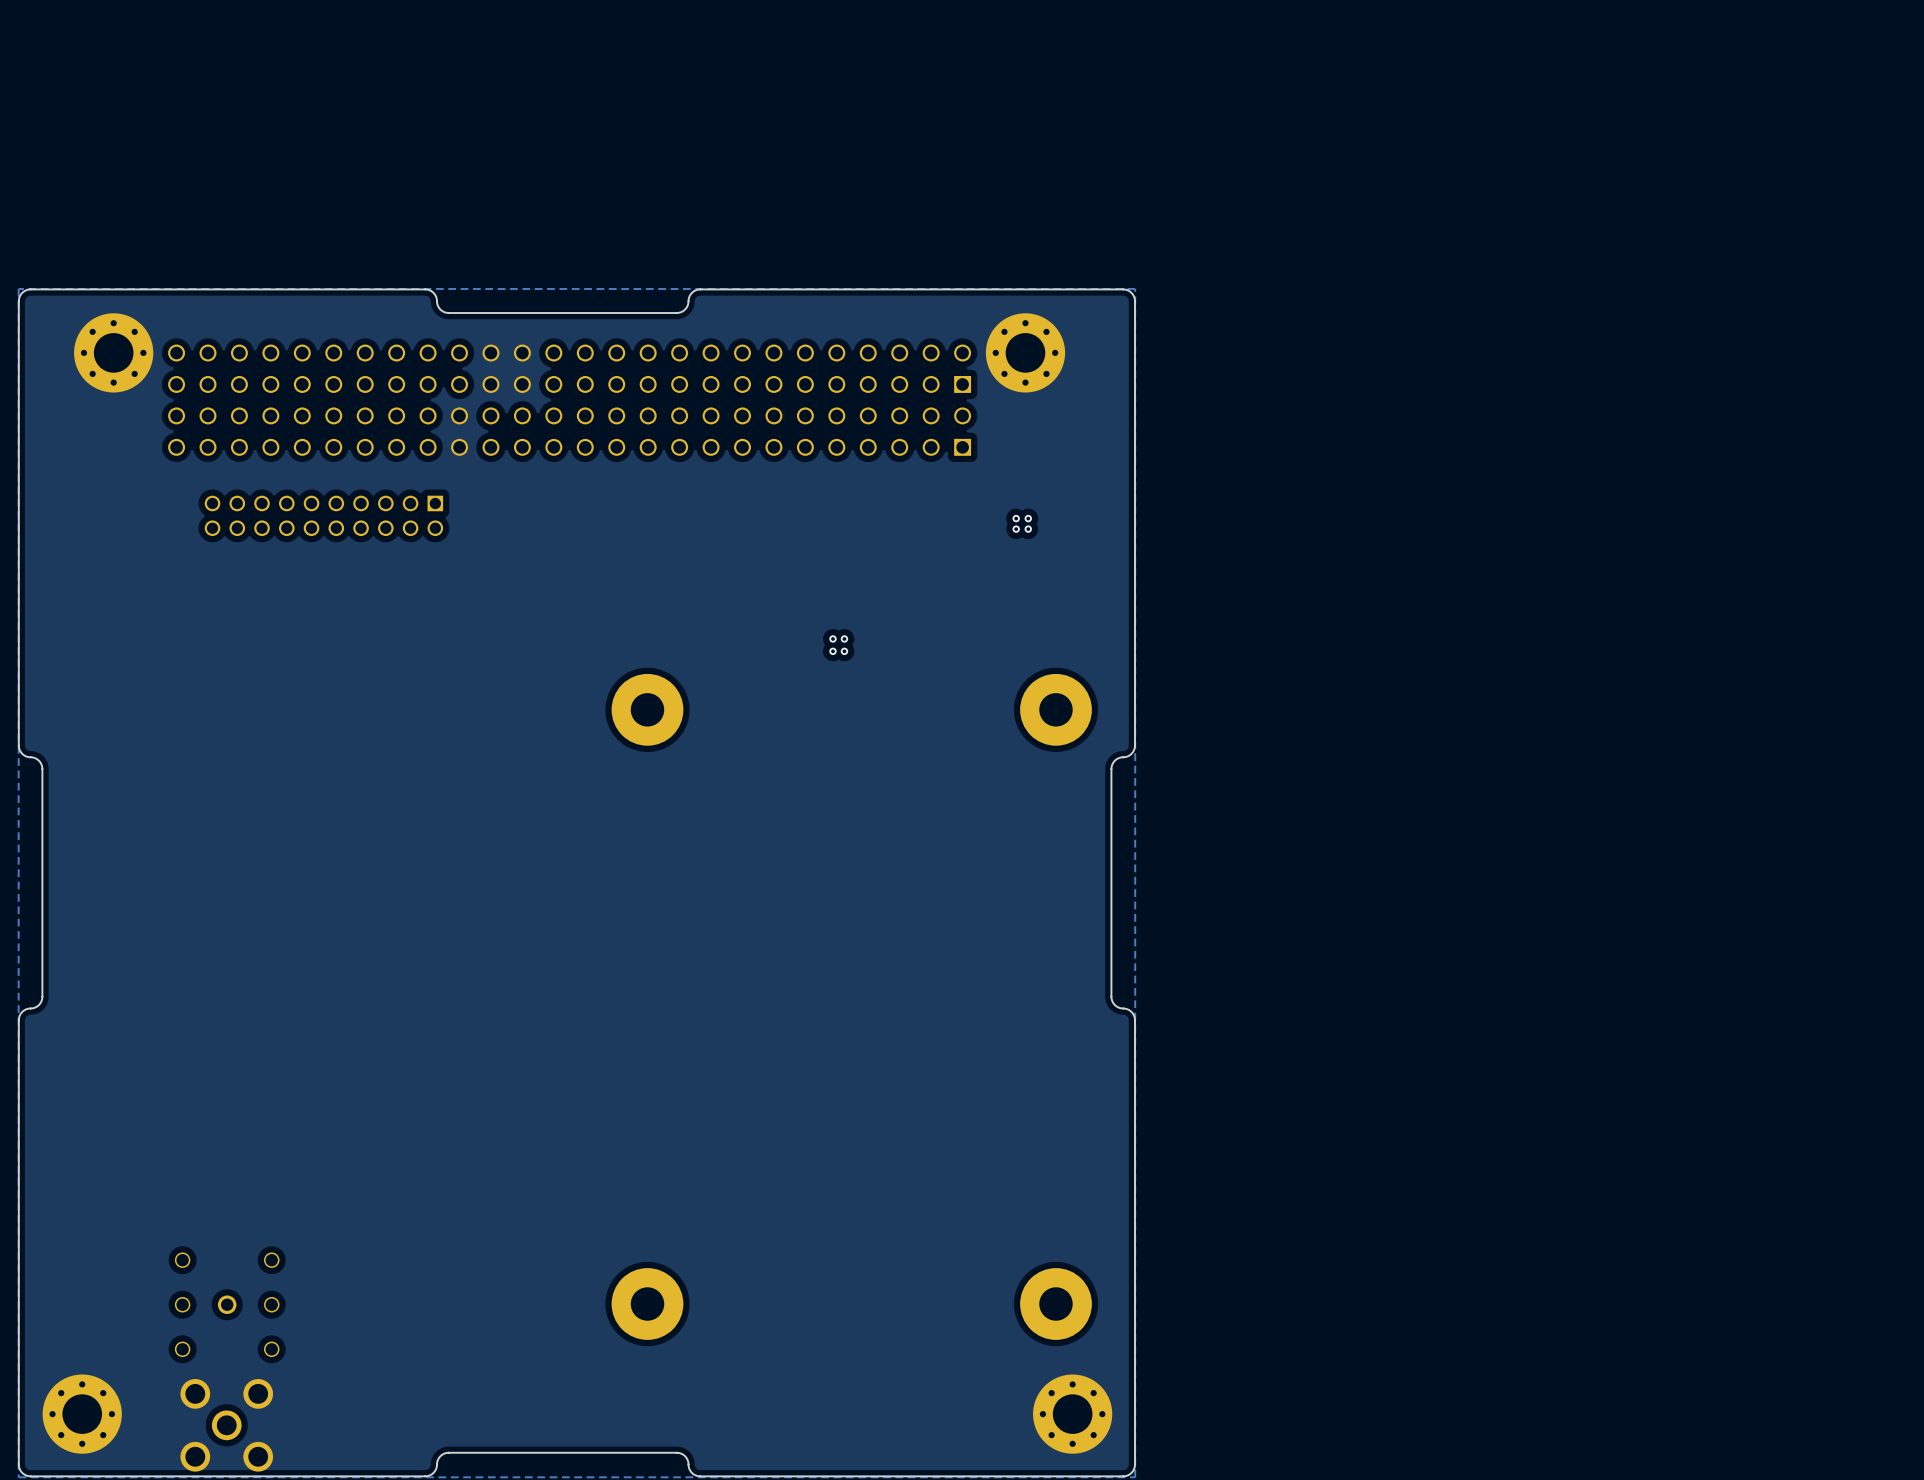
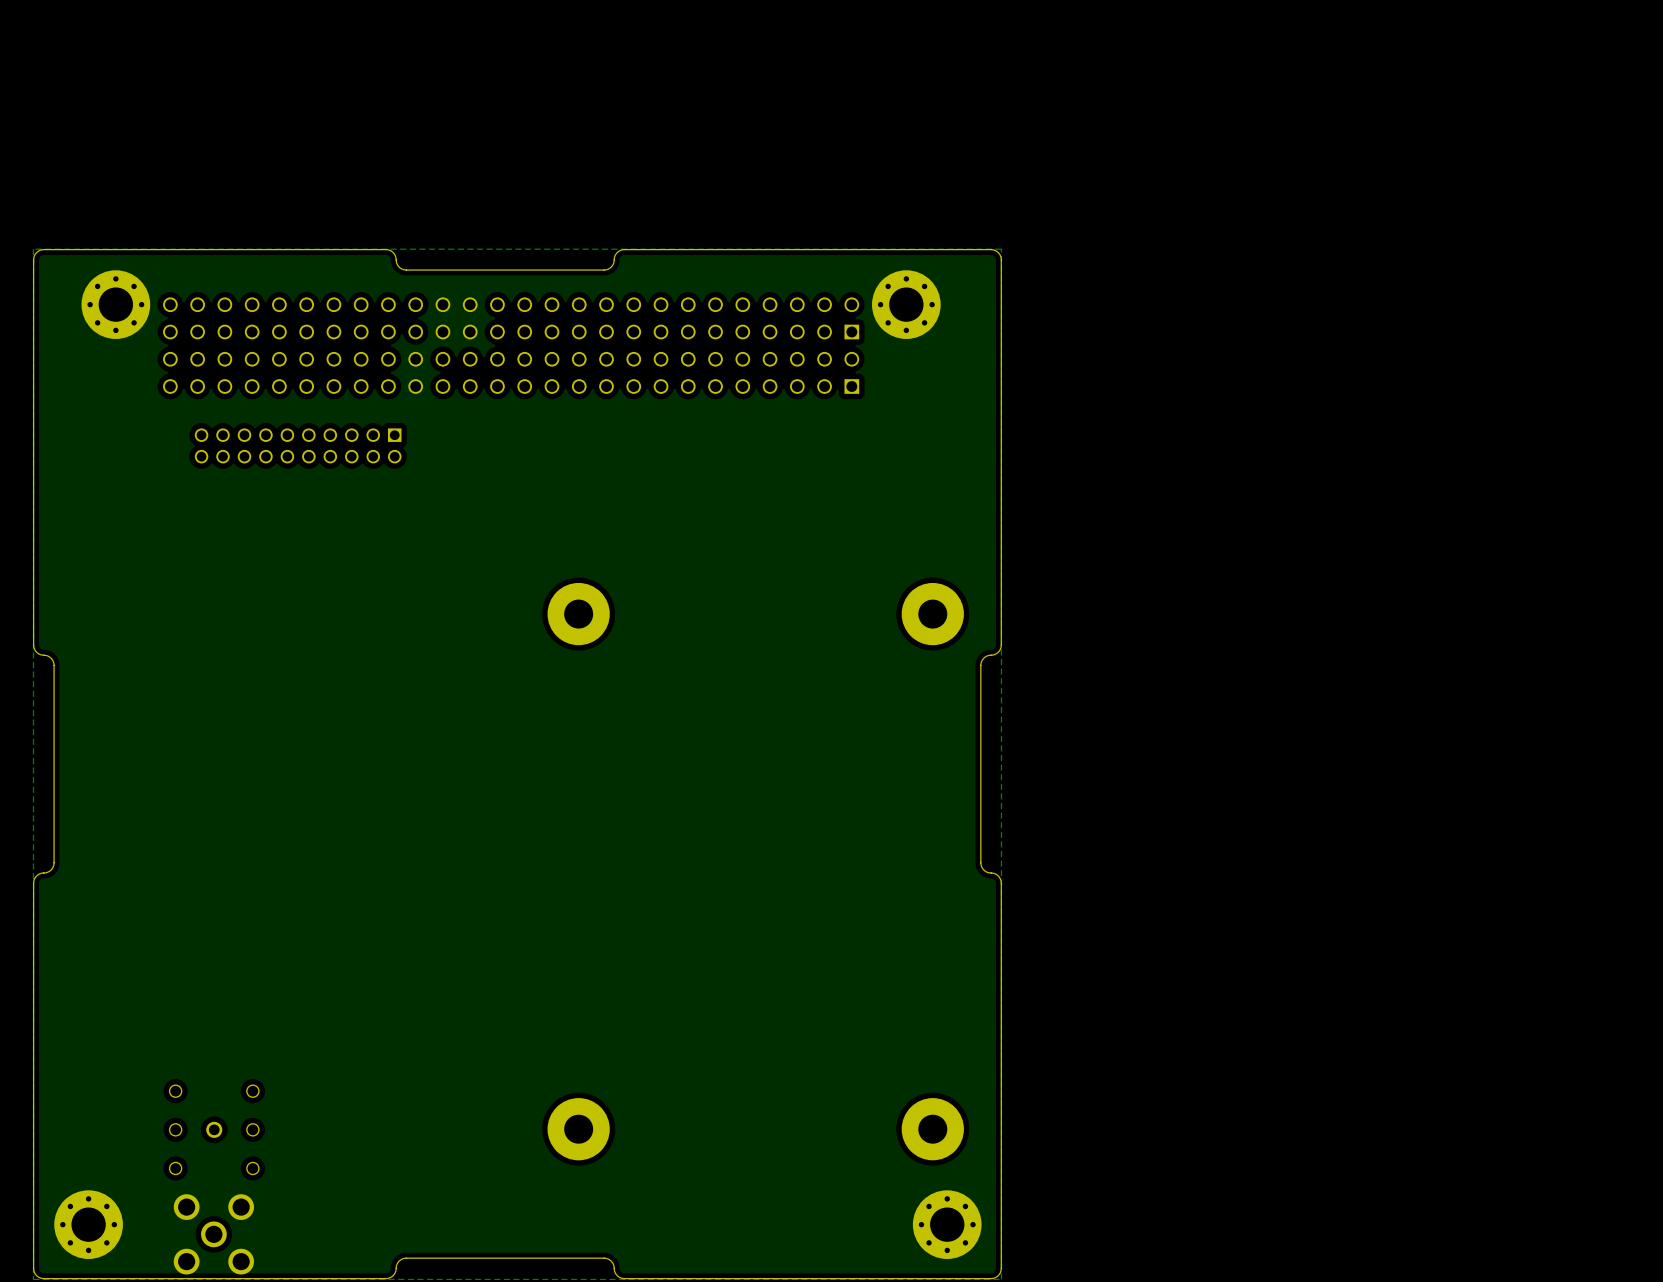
via: (1016, 518) -> none
via: (1028, 518) -> none
via: (1016, 529) -> none
via: (1028, 529) -> none
via: (832, 638) -> none
via: (844, 638) -> none
via: (832, 651) -> none
via: (844, 651) -> none

